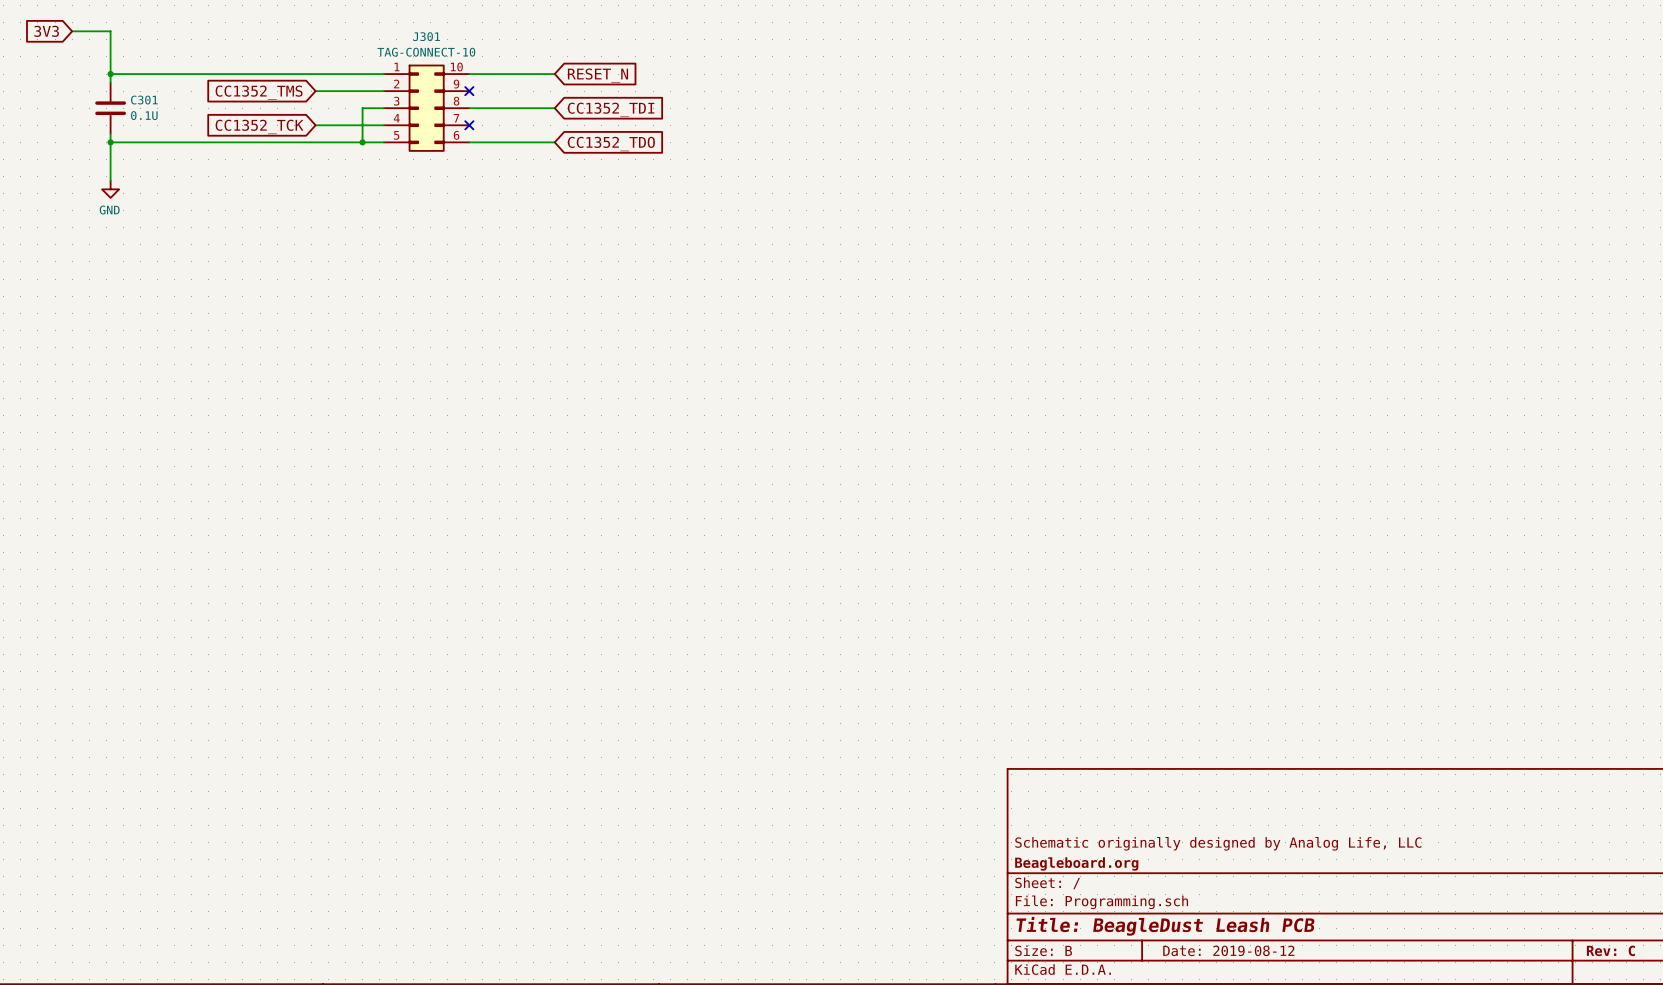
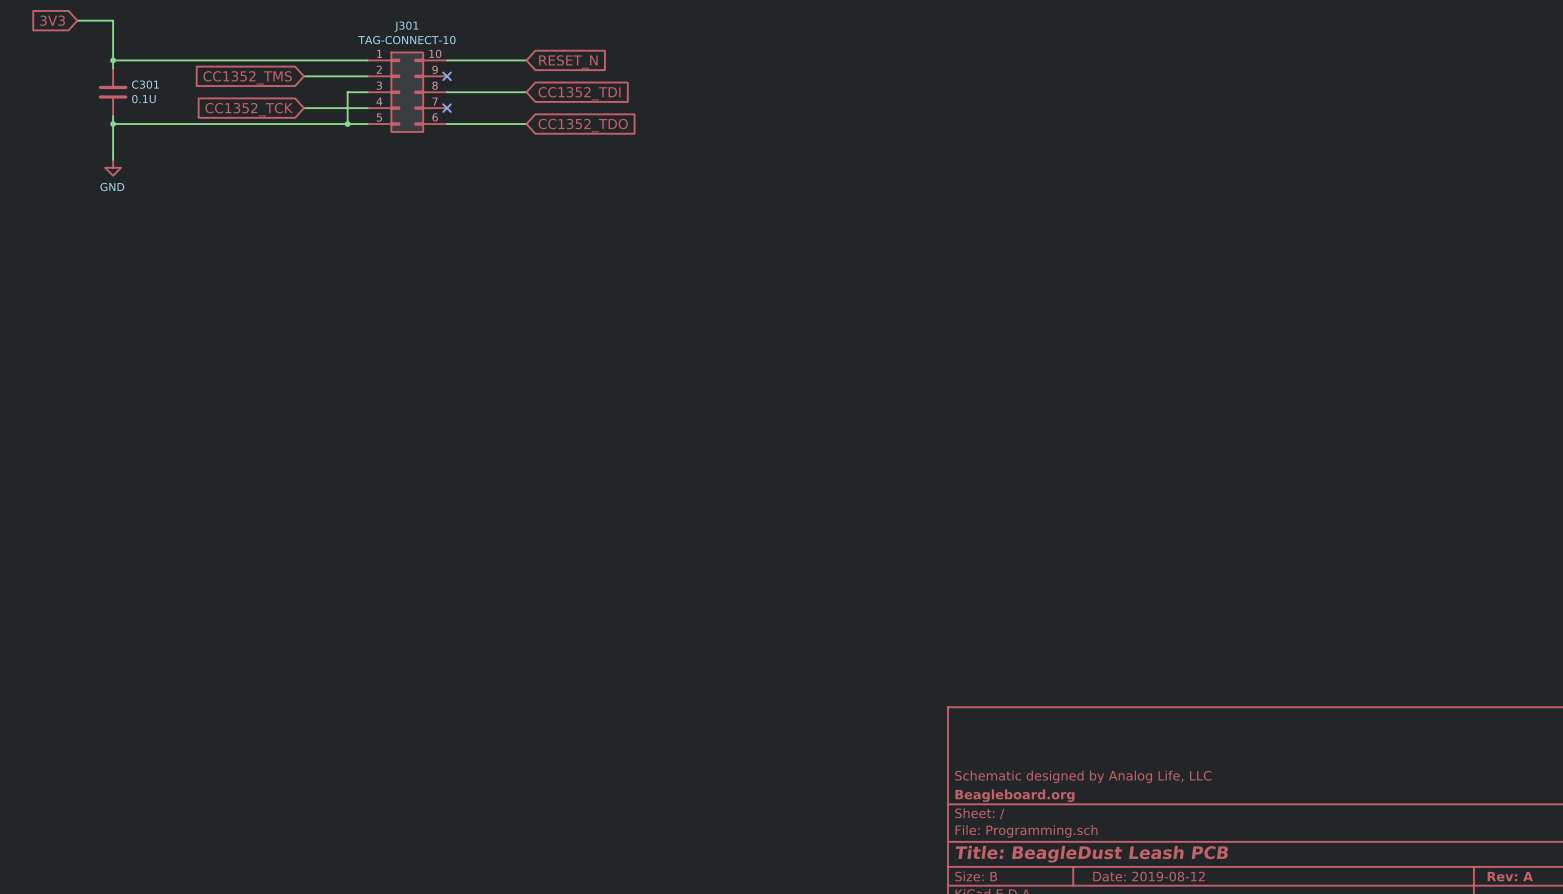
title block: Schematic originally designed by Analog Life, LLC (1218, 843) -> Schematic designed by Analog Life, LLC (1083, 776)
title block: Rev: C (1610, 950) -> Rev: A (1510, 876)

